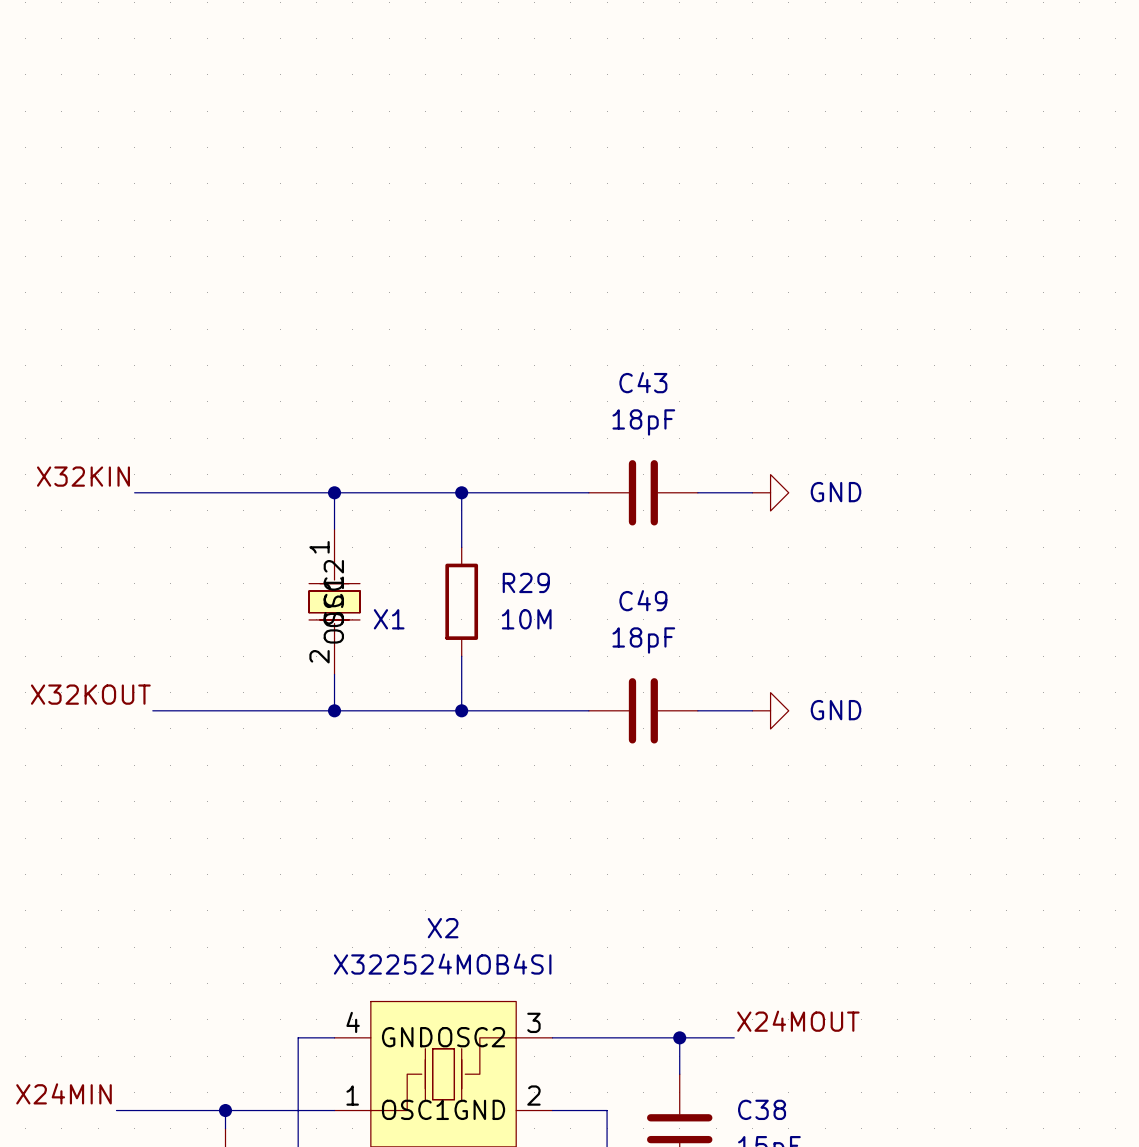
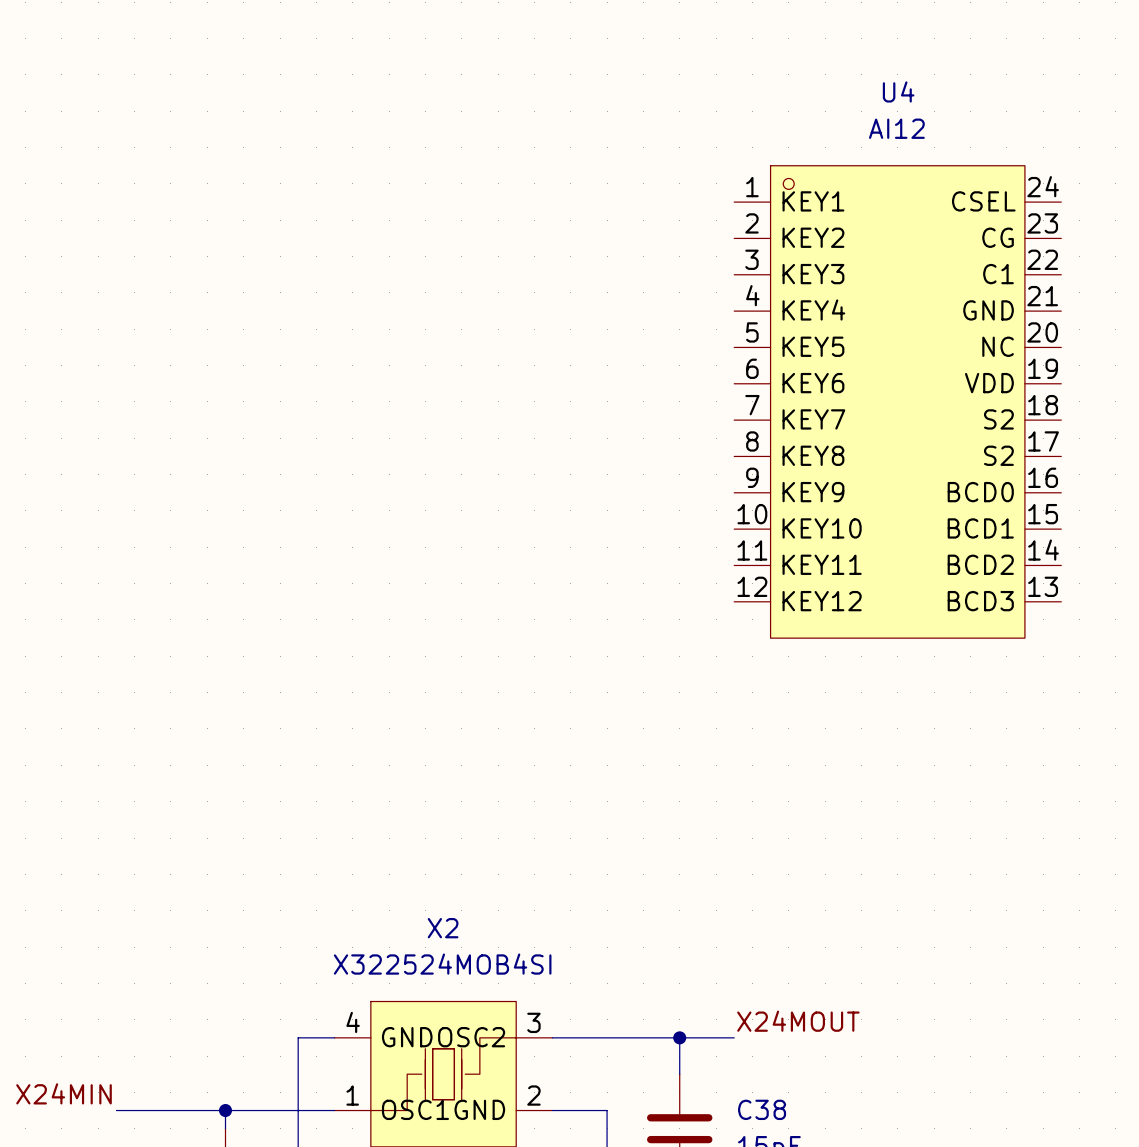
U4: none -> AI12 (897, 401)
label: X32KIN (83, 476) -> none
wire: (134, 492) (588, 492) -> none
wire: (334, 492) (334, 529) -> none
junction: (334, 492) -> none
wire: (461, 492) (461, 547) -> none
junction: (461, 492) -> none
C43: 18pF (643, 492) -> none
wire: (697, 492) (752, 492) -> none
power symbol: GND (770, 492) -> none
X1: (334, 601) -> none
R29: 10M (461, 601) -> none
wire: (461, 656) (461, 710) -> none
wire: (334, 674) (334, 710) -> none
label: X32KOUT (90, 694) -> none
wire: (152, 710) (588, 710) -> none
junction: (334, 710) -> none
junction: (461, 710) -> none
C49: 18pF (643, 710) -> none
wire: (697, 710) (752, 710) -> none
power symbol: GND (770, 710) -> none

